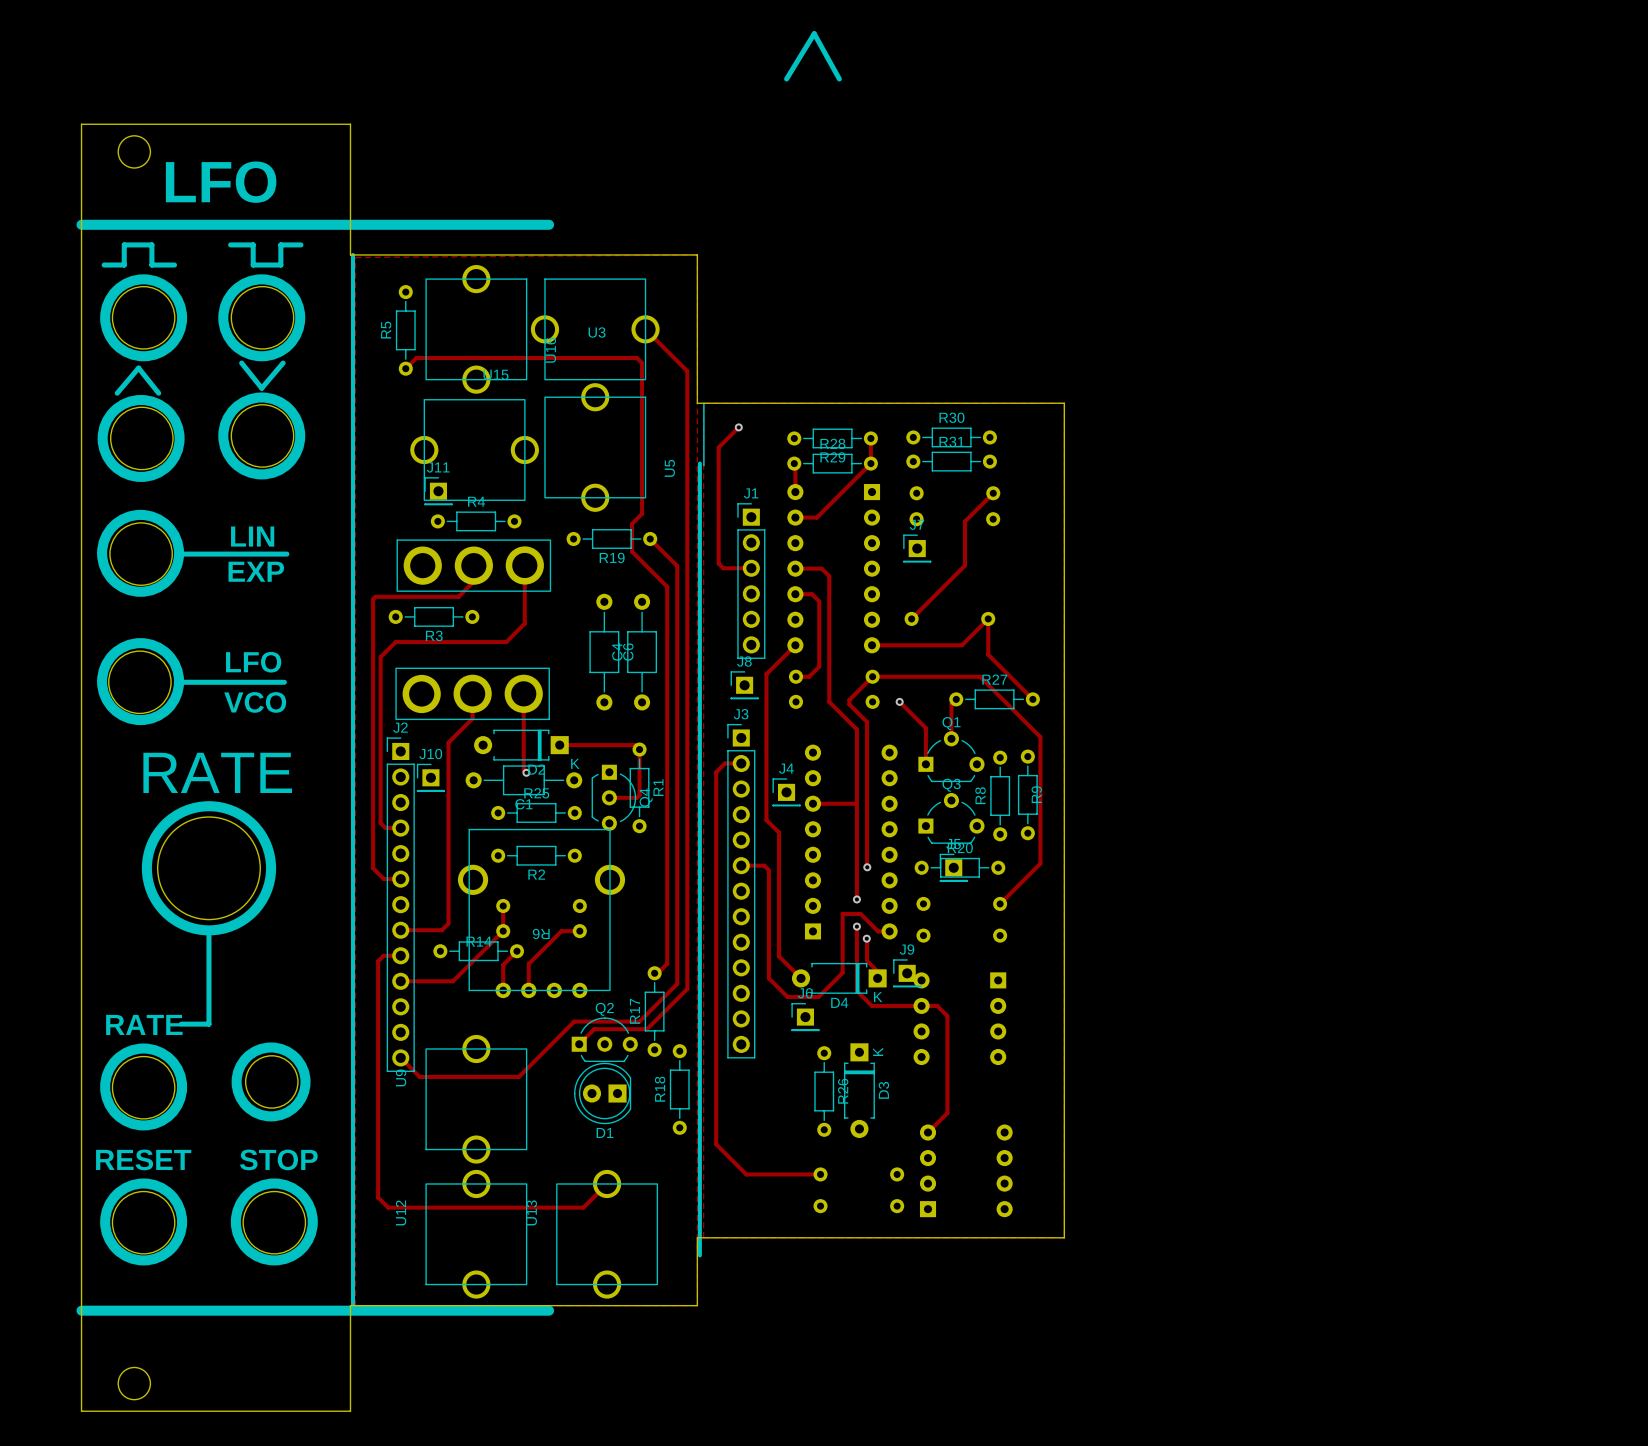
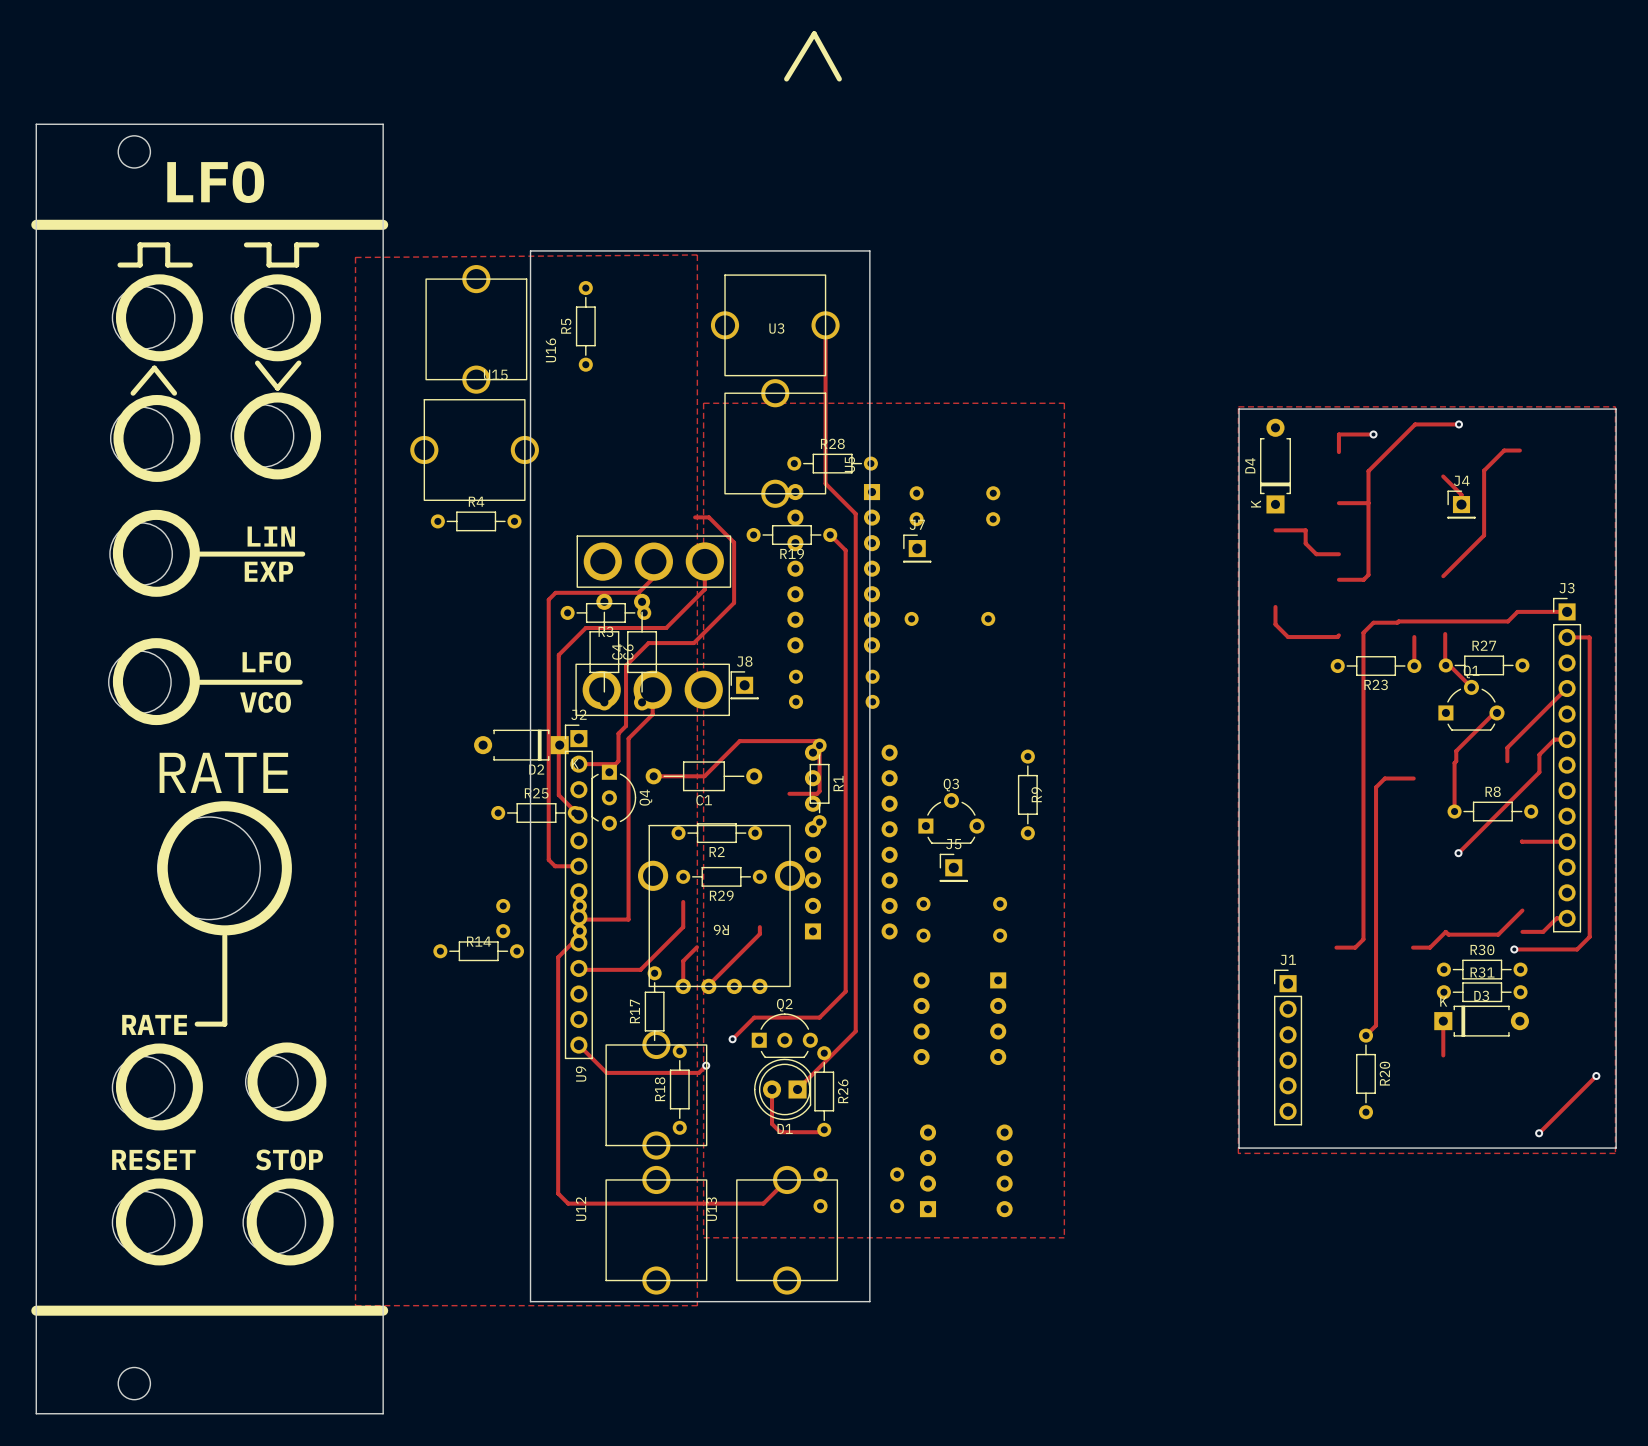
board edge: (81, 124) (81, 1411) (350, 1411) (350, 1305) (697, 1305) (697, 1237) (1064, 1237) (1064, 403) (697, 403) (697, 254) (350, 254) (350, 124) -> (81, 124) (36, 124) (36, 1413) (383, 1413) (383, 124) (350, 124)
line: none -> (36, 224) (81, 224)
line: (383, 224) (549, 224) -> none
line: (140, 244) (124, 244) (124, 265) -> (140, 244) (140, 265) (124, 265)
line: (151, 244) (151, 265) (167, 265) -> (151, 244) (167, 244) (167, 265)
line: (230, 244) (246, 244) -> (300, 244) (316, 244)
line: (253, 244) (253, 265) (269, 265) -> (253, 244) (269, 244) (269, 265)
line: (296, 244) (280, 244) (280, 265) -> (296, 244) (296, 265) (280, 265)
board edge: none -> (530, 250) (869, 250) (869, 1301) (530, 1301) (530, 250)
line: (353, 254) (353, 1305) -> none
line: (104, 265) (119, 265) -> (174, 265) (190, 265)
drawing position: (143, 317) -> (159, 317)
drawing position: (261, 317) -> (277, 317)
track: none -> (825, 325) (825, 483) (855, 513) (855, 1031) (797, 1089)
U3 position: (595, 329) -> (775, 325)
track: (645, 329) (687, 371) (687, 988) (647, 1029) (594, 1029) (579, 1044) -> none
R5 position: (405, 330) -> (585, 326)
line: (241, 363) (261, 388) (283, 363) -> (257, 363) (277, 388) (298, 363)
track: (405, 368) (416, 358) (637, 358) (642, 363) (642, 513) (632, 523) (632, 551) (667, 586) (667, 963) (657, 973) (654, 973) -> none
line: (117, 393) (138, 368) (158, 393) -> (133, 393) (154, 368) (174, 393)
line: (703, 403) (703, 465) -> none
zone outline: none -> (1238, 406) (1615, 406) (1615, 1153) (1238, 1153) (1238, 406)
board edge: none -> (1239, 409) (1616, 409) (1616, 1148) (1239, 1148) (1239, 409)
track: none -> (1458, 424) (1415, 424) (1368, 471) (1368, 574) (1363, 579) (1338, 579)
via: none -> (1458, 424)
track: (738, 427) (718, 447) (718, 563) (723, 568) (751, 568) -> none
via: (738, 427) -> none
track: none -> (1373, 434) (1338, 434) (1338, 452)
via: none -> (1373, 434)
drawing position: (261, 435) -> (277, 435)
R30 position: (951, 437) -> (1482, 969)
drawing position: (141, 438) -> (156, 438)
R29 position: (832, 438) -> (721, 876)
track: (870, 438) (870, 463) (816, 517) (795, 517) -> none
U5 position: (595, 447) -> (775, 443)
track: none -> (1519, 450) (1504, 450) (1484, 470) (1484, 535) (1443, 576)
R31 position: (951, 461) -> (1482, 992)
line: (699, 463) (699, 1255) -> none
track: (794, 463) (795, 492) -> none
track: none -> (1443, 476) (1461, 494) (1461, 504)
J11: (438, 491) -> none
track: (993, 493) (965, 521) (965, 565) (911, 618) -> none
track: none -> (1338, 503) (1368, 503)
track: none -> (695, 517) (708, 517) (734, 542) (734, 602) (693, 643) (648, 643) (626, 665) (626, 726) (618, 733) (618, 761) (615, 764) (578, 764)
track: none -> (1275, 530) (1305, 530) (1305, 543) (1316, 554) (1338, 554)
track: none -> (830, 534) (845, 550) (845, 991) (819, 1017) (754, 1017) (732, 1039)
text position: LIN (252, 536) -> LIN (271, 536)
R19 position: (611, 539) -> (791, 534)
track: (650, 539) (677, 566) (677, 983) (639, 1021) (574, 1021) (518, 1076) (419, 1076) (400, 1057) -> none
drawing position: (140, 553) -> (156, 553)
line: (183, 554) (199, 554) -> (286, 554) (302, 554)
track: none -> (653, 561) (653, 577) (638, 592) (555, 592) (548, 599) (548, 859) (555, 866) (578, 866)
part: none -> (653, 561)
track: none -> (704, 561) (704, 589) (666, 628) (585, 628) (558, 655) (558, 795) (578, 815)
track: (473, 565) (473, 581) (458, 596) (375, 596) (373, 599) (373, 868) (383, 879) (400, 879) -> none
part: (473, 565) -> none
track: (524, 565) (524, 623) (506, 642) (395, 642) (380, 657) (380, 823) (385, 828) (400, 828) -> none
track: (795, 568) (821, 568) (829, 576) (829, 701) (856, 729) (856, 899) -> none
text position: EXP (256, 571) -> EXP (268, 571)
J1 position: (751, 581) -> (1288, 1047)
track: (795, 594) (812, 594) (819, 601) (819, 666) (809, 676) (796, 676) -> none
track: none -> (1275, 606) (1275, 624) (1288, 637) (1337, 637) (1338, 635)
track: none -> (1567, 611) (1517, 611) (1508, 621) (1373, 622) (1363, 632) (1363, 939) (1355, 947) (1336, 947)
R3 position: (434, 616) -> (605, 612)
track: none -> (1445, 634) (1445, 664) (1449, 665) (1471, 687)
track: none -> (1414, 637) (1414, 665)
track: none -> (1567, 637) (1589, 637) (1589, 936) (1577, 949) (1514, 949)
track: (795, 645) (766, 674) (766, 820) (779, 832) (779, 956) (801, 978) -> none
track: (872, 645) (961, 645) (988, 618) (988, 654) (1032, 699) -> none
text position: LFO (253, 662) -> LFO (266, 662)
R23: none -> (1376, 665)
drawing position: (140, 681) -> (156, 681)
line: (183, 682) (199, 682) -> (284, 682) (300, 682)
track: none -> (1567, 688) (1507, 747) (1507, 761)
track: none -> (652, 689) (652, 714) (628, 738) (628, 919) (581, 919) (578, 917)
part: none -> (652, 689)
track: (472, 693) (472, 718) (448, 742) (448, 923) (441, 930) (400, 930) -> none
part: (472, 693) -> none
track: (523, 693) (523, 770) -> none
track: (956, 699) (951, 704) (951, 738) -> none
R27 position: (994, 699) -> (1484, 665)
track: (899, 701) (925, 728) (925, 764) -> none
via: (899, 701) -> none
text position: VCO (255, 702) -> VCO (265, 702)
track: none -> (1496, 712) (1494, 712) (1456, 751) (1454, 811)
track: none -> (1567, 739) (1554, 739) (1539, 754) (1539, 772) (1458, 853)
track: (559, 745) (635, 745) (639, 749) (639, 795) (637, 797) (609, 797) -> none
Q1 position: (951, 756) -> (1471, 705)
track: (741, 763) (724, 763) (716, 772) (716, 1144) (746, 1174) (820, 1174) -> none
text position: RATE (217, 772) -> RATE (223, 772)
via: (526, 772) -> none
track: none -> (653, 776) (704, 776) (739, 741) (815, 741) (819, 745) (819, 791) (817, 793) (789, 793)
J10: (430, 777) -> none
track: none -> (1413, 778) (1384, 778) (1376, 787) (1376, 1025) (1365, 1035)
C1 position: (523, 780) -> (703, 776)
R1 position: (639, 787) -> (819, 783)
J4 position: (786, 792) -> (1461, 504)
R8 rotation: 0° (1000, 796) -> 90° clockwise (1492, 811)
R8 position: (1000, 796) -> (1492, 811)
track: (856, 802) (812, 803) -> none
track: none -> (1521, 841) (1567, 841)
via: none -> (1458, 853)
R2 position: (536, 855) -> (716, 833)
track: (741, 865) (764, 865) (768, 870) (768, 978) (787, 996) (818, 996) (842, 972) (842, 914) (860, 914) (878, 931) (895, 931) -> none
track: (866, 867) (866, 722) (849, 704) (849, 699) (872, 676) (980, 676) (1040, 737) (1040, 863) (1000, 903) -> none
via: (867, 867) -> none
R20 rotation: 0° (959, 867) -> 90° clockwise (1365, 1073)
R20 position: (959, 867) -> (1365, 1073)
drawing position: (208, 868) -> (224, 868)
J3 position: (741, 891) -> (1567, 765)
via: (856, 899) -> none
track: none -> (683, 901) (683, 927) (640, 969) (578, 968)
J2 position: (400, 904) -> (578, 891)
track: (503, 905) (503, 931) (453, 981) (400, 981) -> none
track: none -> (1522, 910) (1498, 934) (1448, 934) (1445, 931) (1430, 947) (1413, 947)
R6 position: (541, 913) -> (721, 909)
track: none -> (1567, 918) (1556, 918) (1543, 931) (1522, 931)
track: (856, 926) (856, 990) (871, 1005) (937, 1005) (947, 1016) (947, 1113) (928, 1132) -> none
via: (856, 926) -> none
track: none -> (759, 927) (759, 934) (708, 986)
track: (579, 931) (561, 931) (528, 964) (528, 990) -> none
line: (208, 936) (208, 1024) -> (224, 936) (224, 1024) (208, 1024)
track: (866, 938) (866, 960) (877, 971) (877, 978) -> none
via: (866, 938) -> none
track: none -> (578, 942) (572, 942) (558, 957) (558, 1193) (568, 1203) (763, 1203) (787, 1179)
via: none -> (1514, 949)
track: (516, 951) (503, 965) (503, 990) -> (697, 947) (683, 961) (683, 986)
track: (400, 955) (383, 955) (378, 961) (378, 1197) (388, 1207) (583, 1207) (607, 1183) -> none
J9: (907, 973) -> none
D4 rotation: 0° (839, 978) -> 90° clockwise (1275, 466)
D4 position: (839, 978) -> (1275, 466)
J6: (805, 1017) -> none
track: none -> (1443, 1021) (1443, 1055)
text position: RATE (144, 1024) -> RATE (154, 1024)
line: (181, 1024) (197, 1024) -> none
Q2 position: (604, 1039) -> (784, 1035)
via: none -> (732, 1039)
track: none -> (578, 1045) (606, 1072) (698, 1072) (706, 1065)
D1 footprint: [574, 1062, 632, 1125] -> [754, 1058, 812, 1121]
via: none -> (706, 1065)
track: none -> (1596, 1076) (1539, 1133)
via: none -> (1596, 1076)
drawing position: (271, 1081) -> (286, 1081)
drawing position: (143, 1086) -> (159, 1086)
track: none -> (772, 1089) (772, 1123) (780, 1132) (821, 1132)
D3 rotation: 0° (859, 1090) -> 90° counterclockwise (1481, 1021)
D3 position: (859, 1090) -> (1481, 1021)
U9 position: (476, 1099) -> (656, 1095)
via: none -> (1539, 1133)
text position: RESET (143, 1159) -> RESET (153, 1159)
text position: STOP (278, 1159) -> STOP (289, 1159)
drawing position: (143, 1221) -> (159, 1221)
drawing position: (274, 1221) -> (290, 1221)
U12 position: (476, 1234) -> (656, 1230)
U13 position: (607, 1234) -> (787, 1230)
line: none -> (36, 1310) (81, 1310)
line: (383, 1310) (549, 1310) -> none

